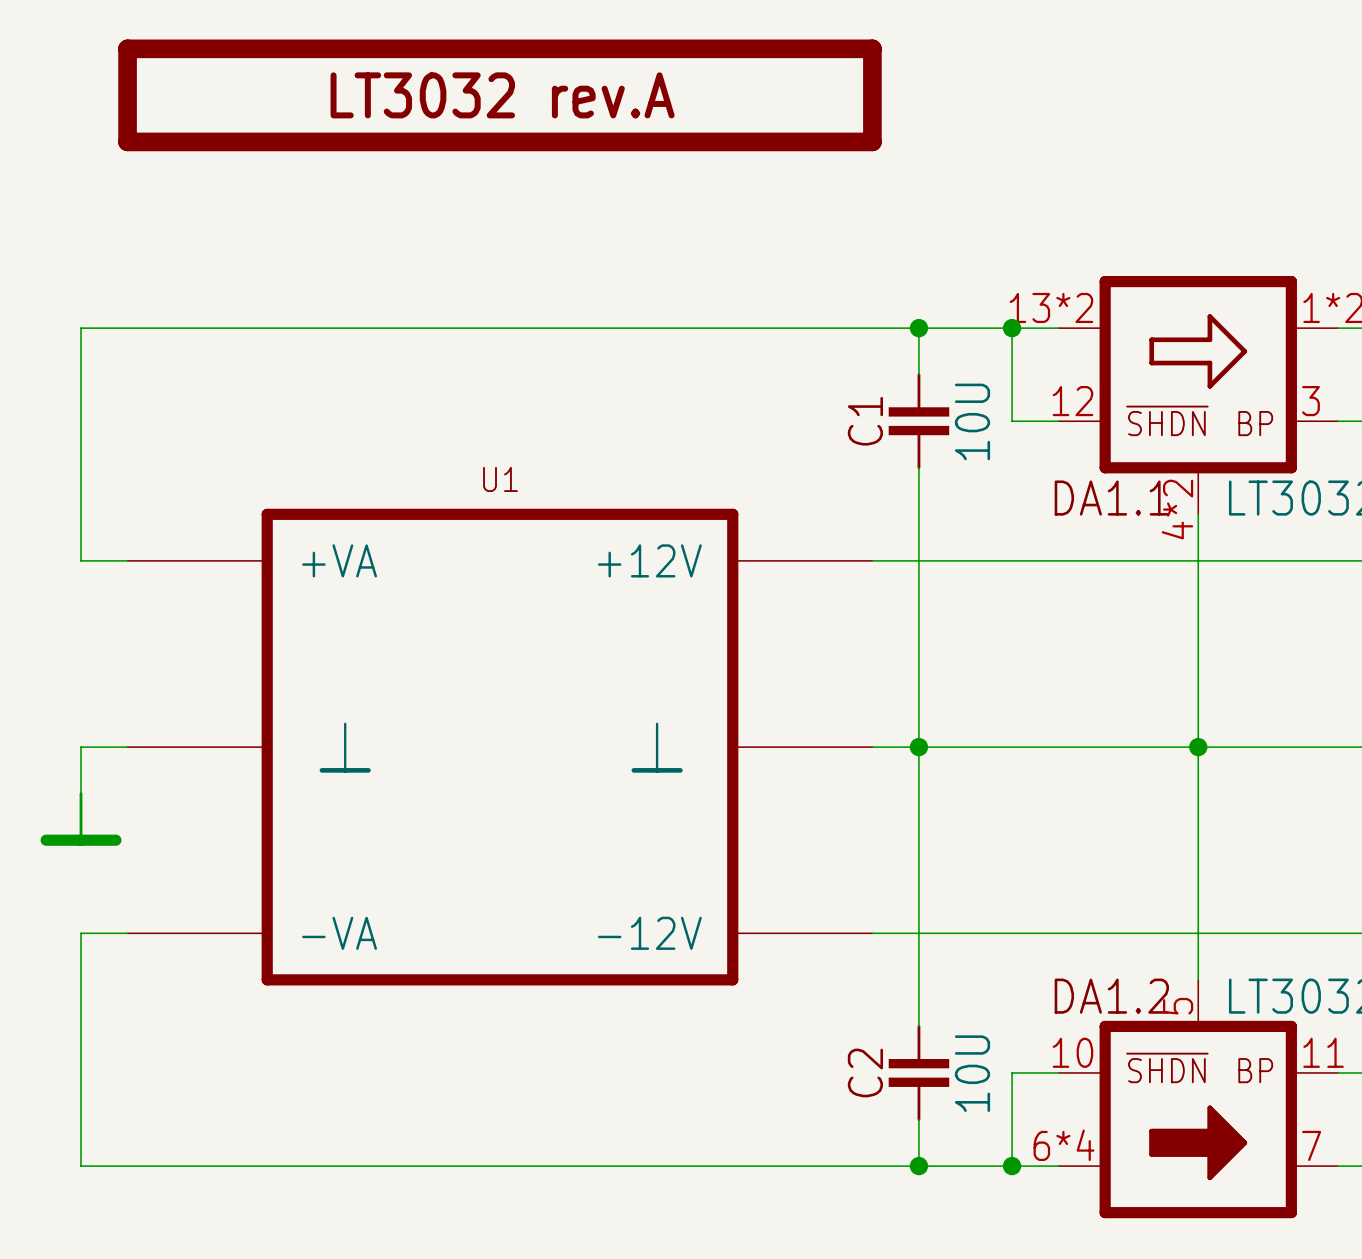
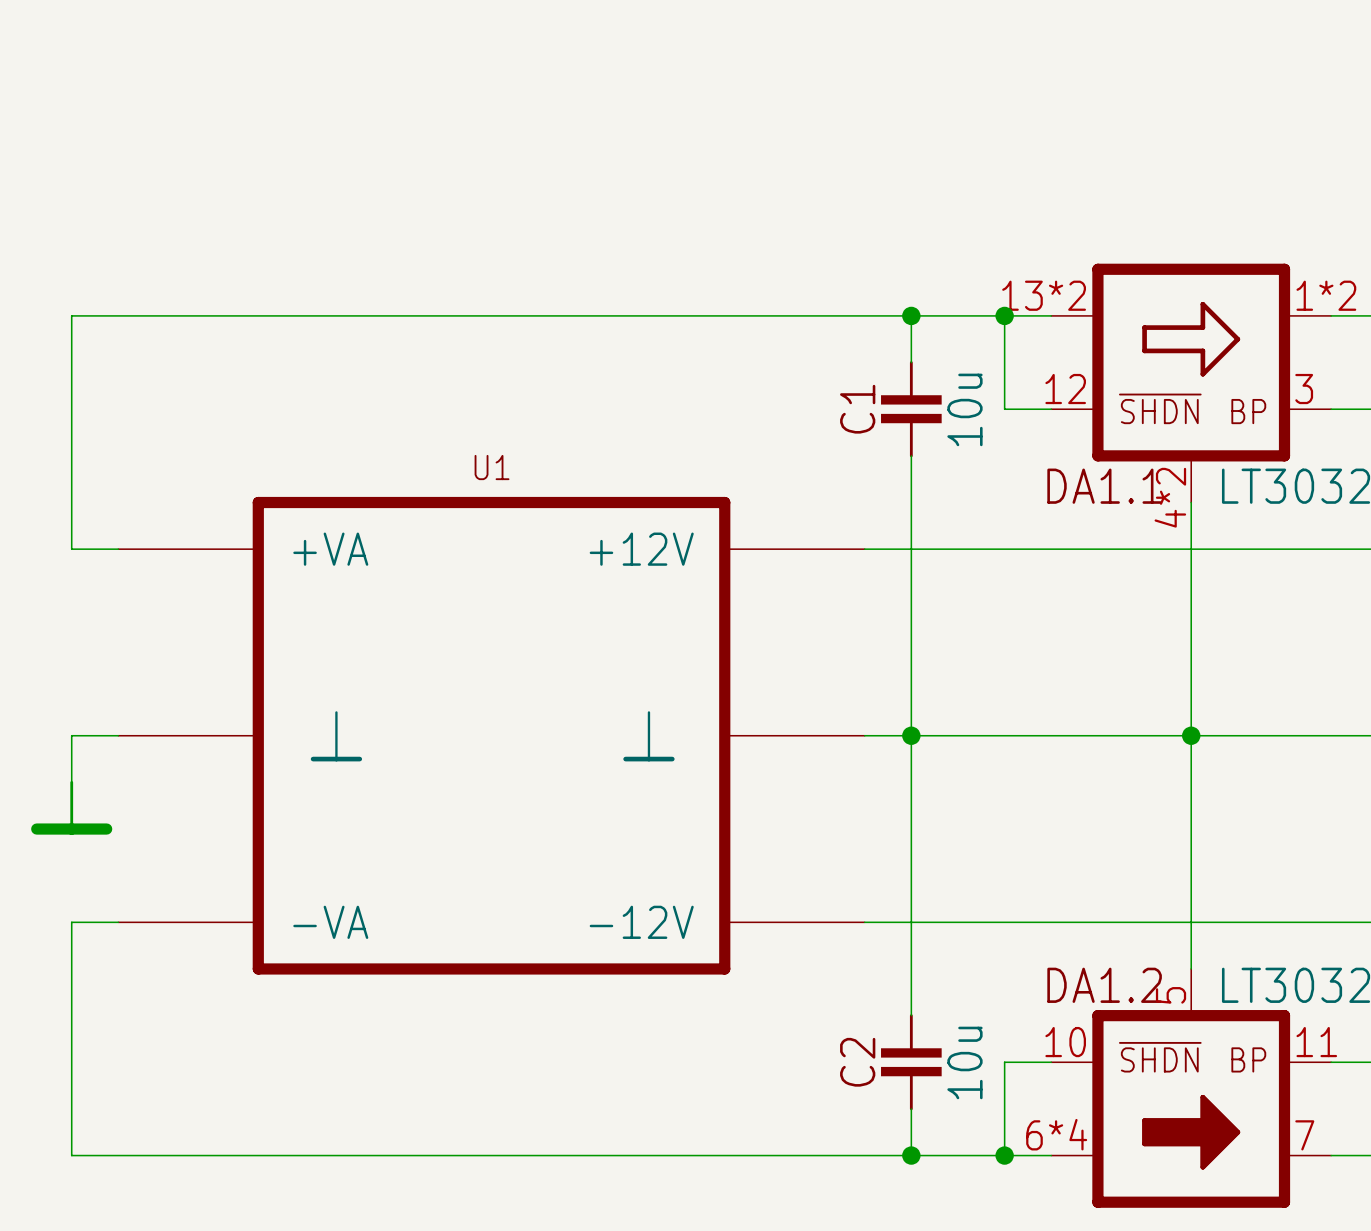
part: LT3032 rev.A (499, 95) -> none
C1 value: 10U (972, 421) -> 10u (964, 409)
C2 value: 10U (972, 1073) -> 10u (964, 1062)

